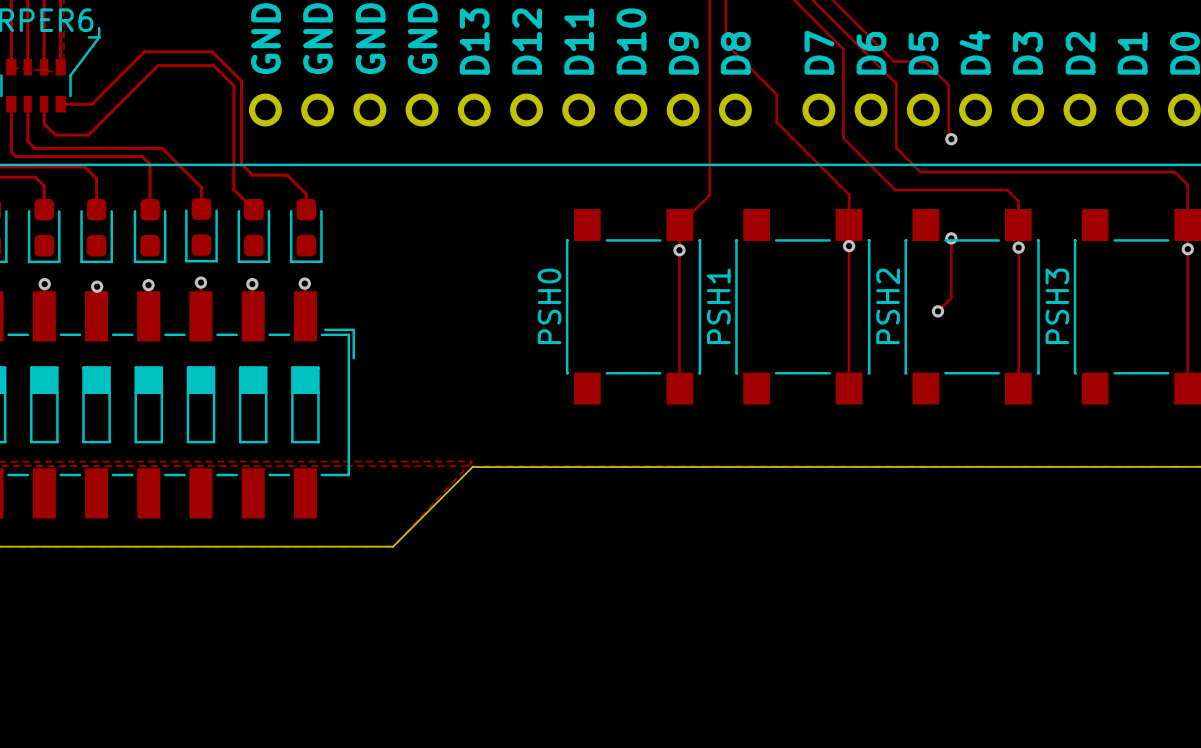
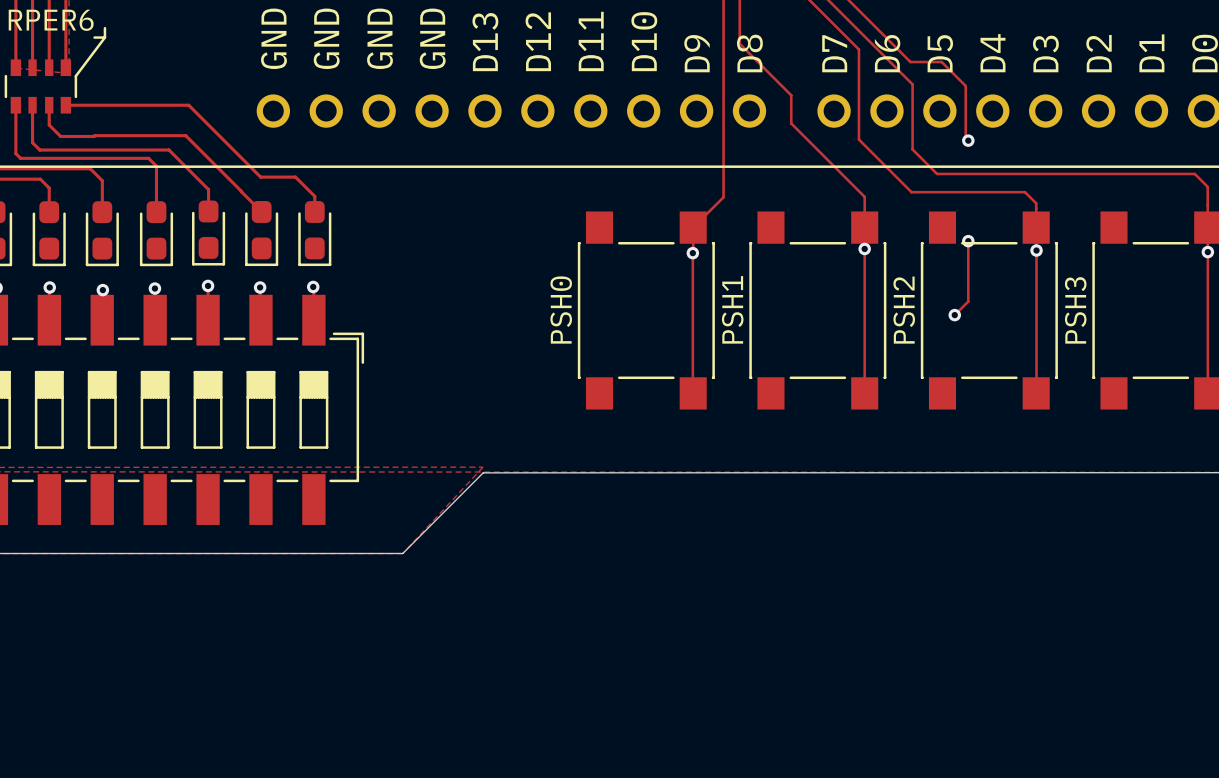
track: (92, 104) (144, 51) (212, 51) (241, 81) (241, 163) -> (97, 105) (188, 105) (249, 165)
track: (89, 134) (157, 65) (213, 65) (233, 85) (233, 189) -> (94, 135) (185, 135) (241, 191)

